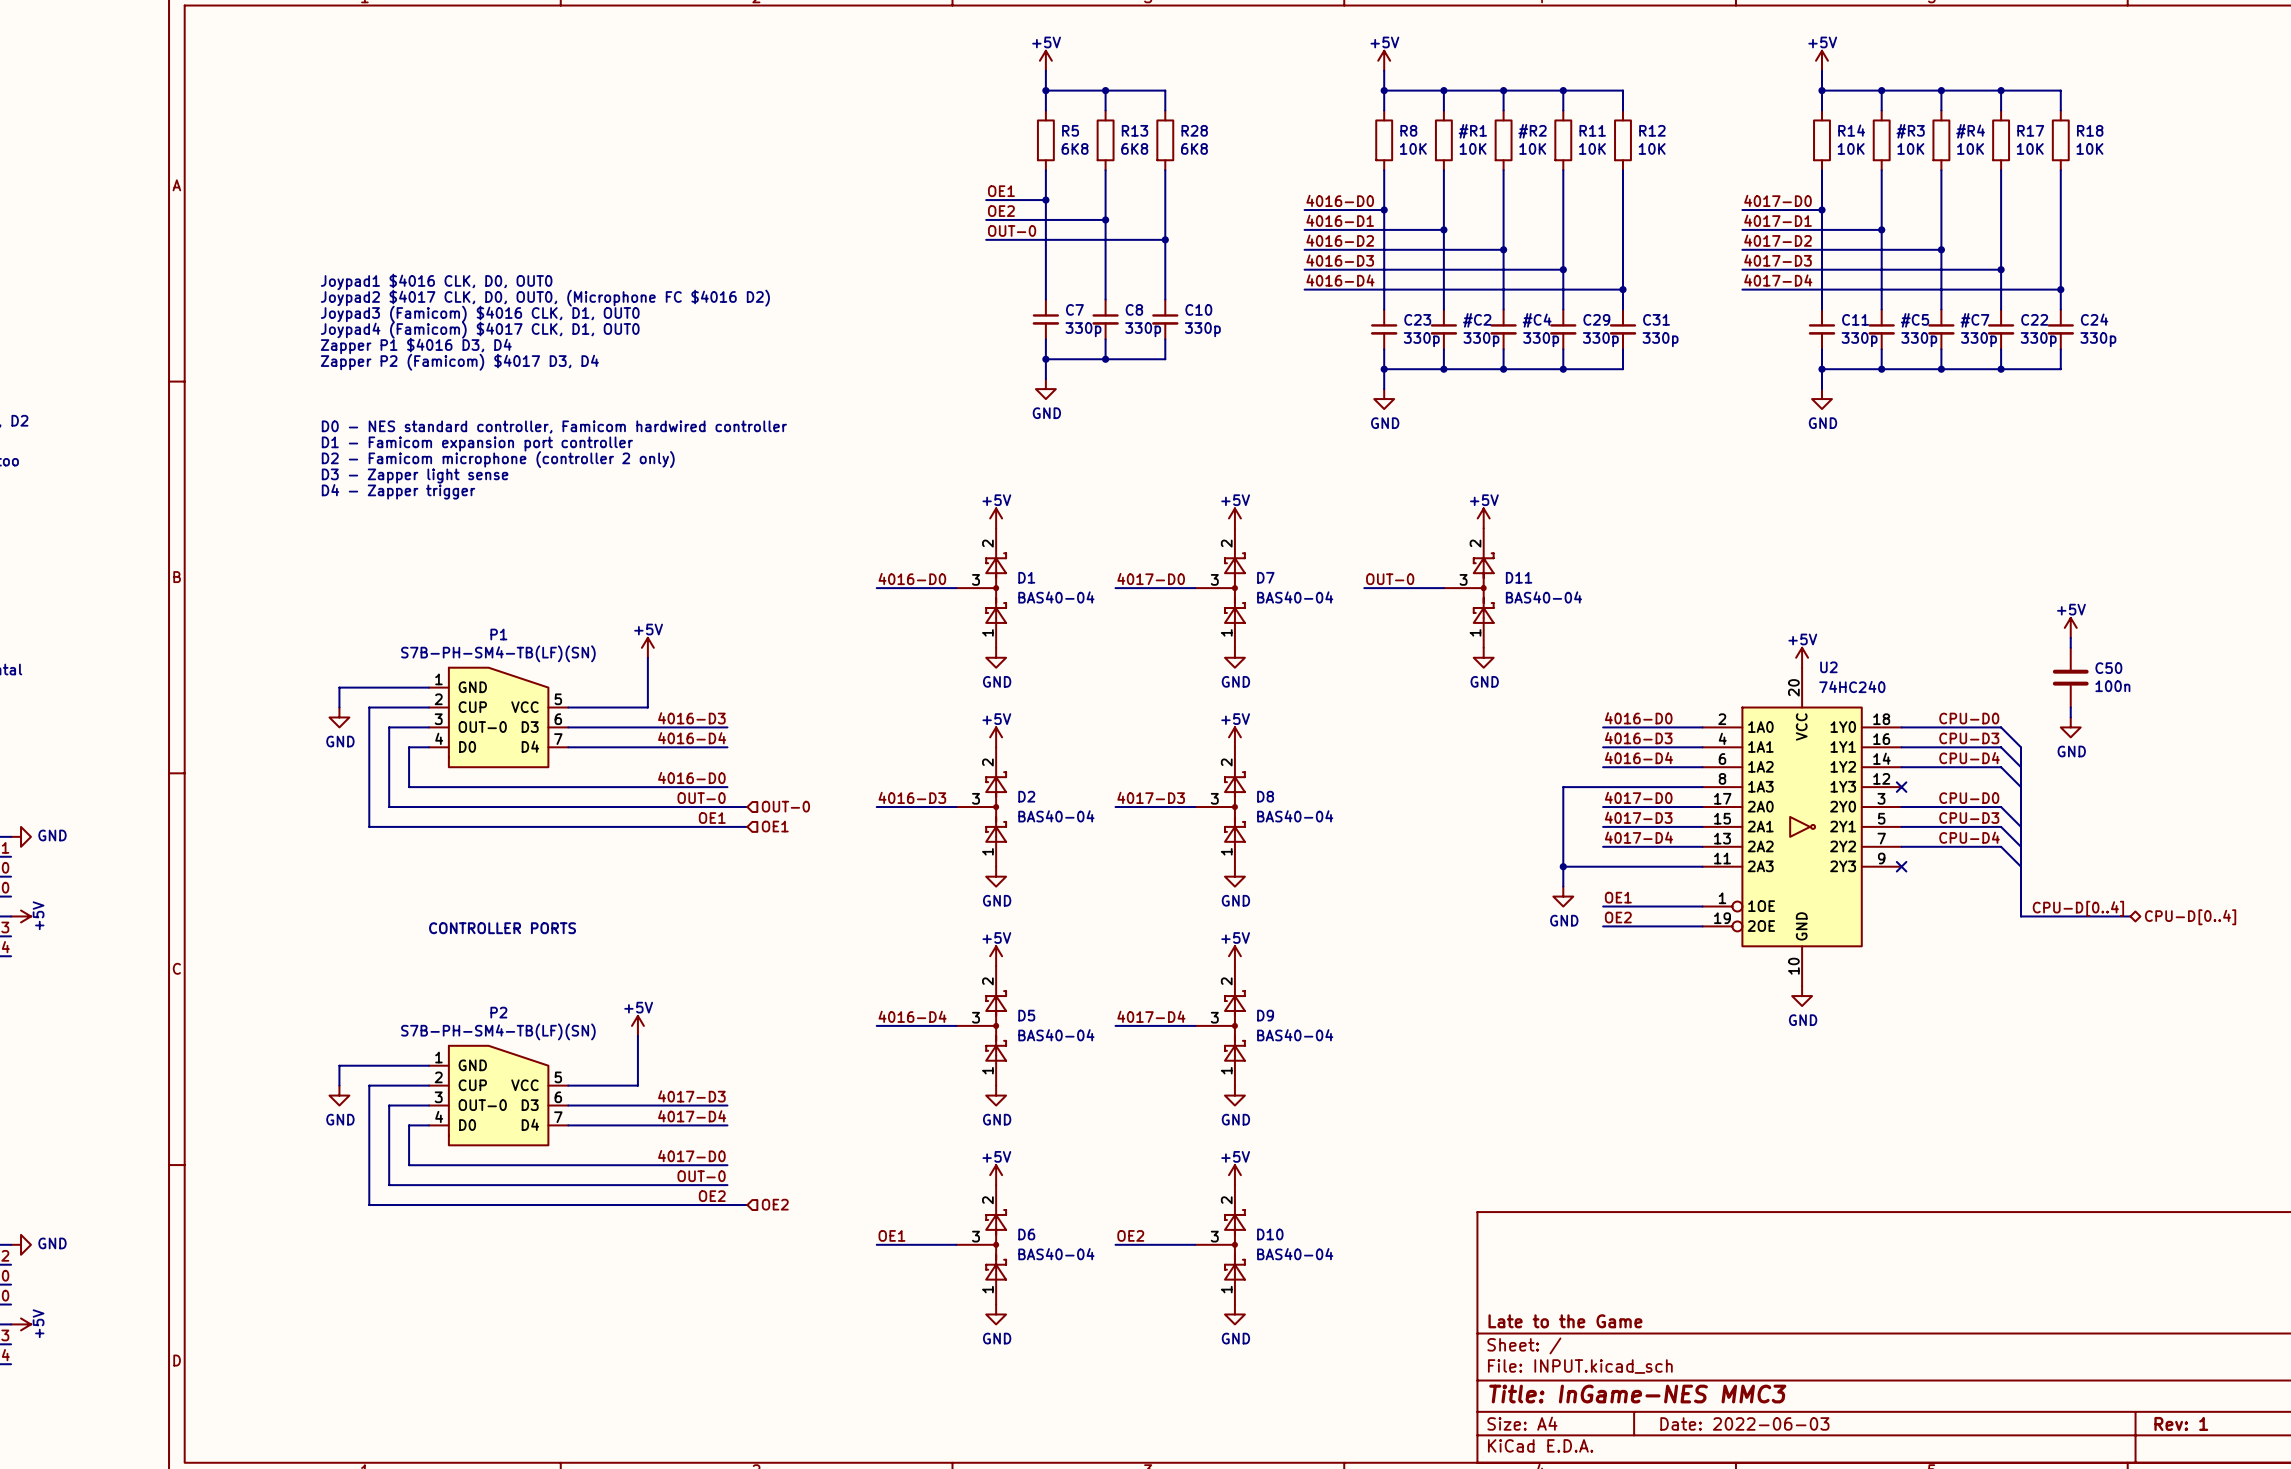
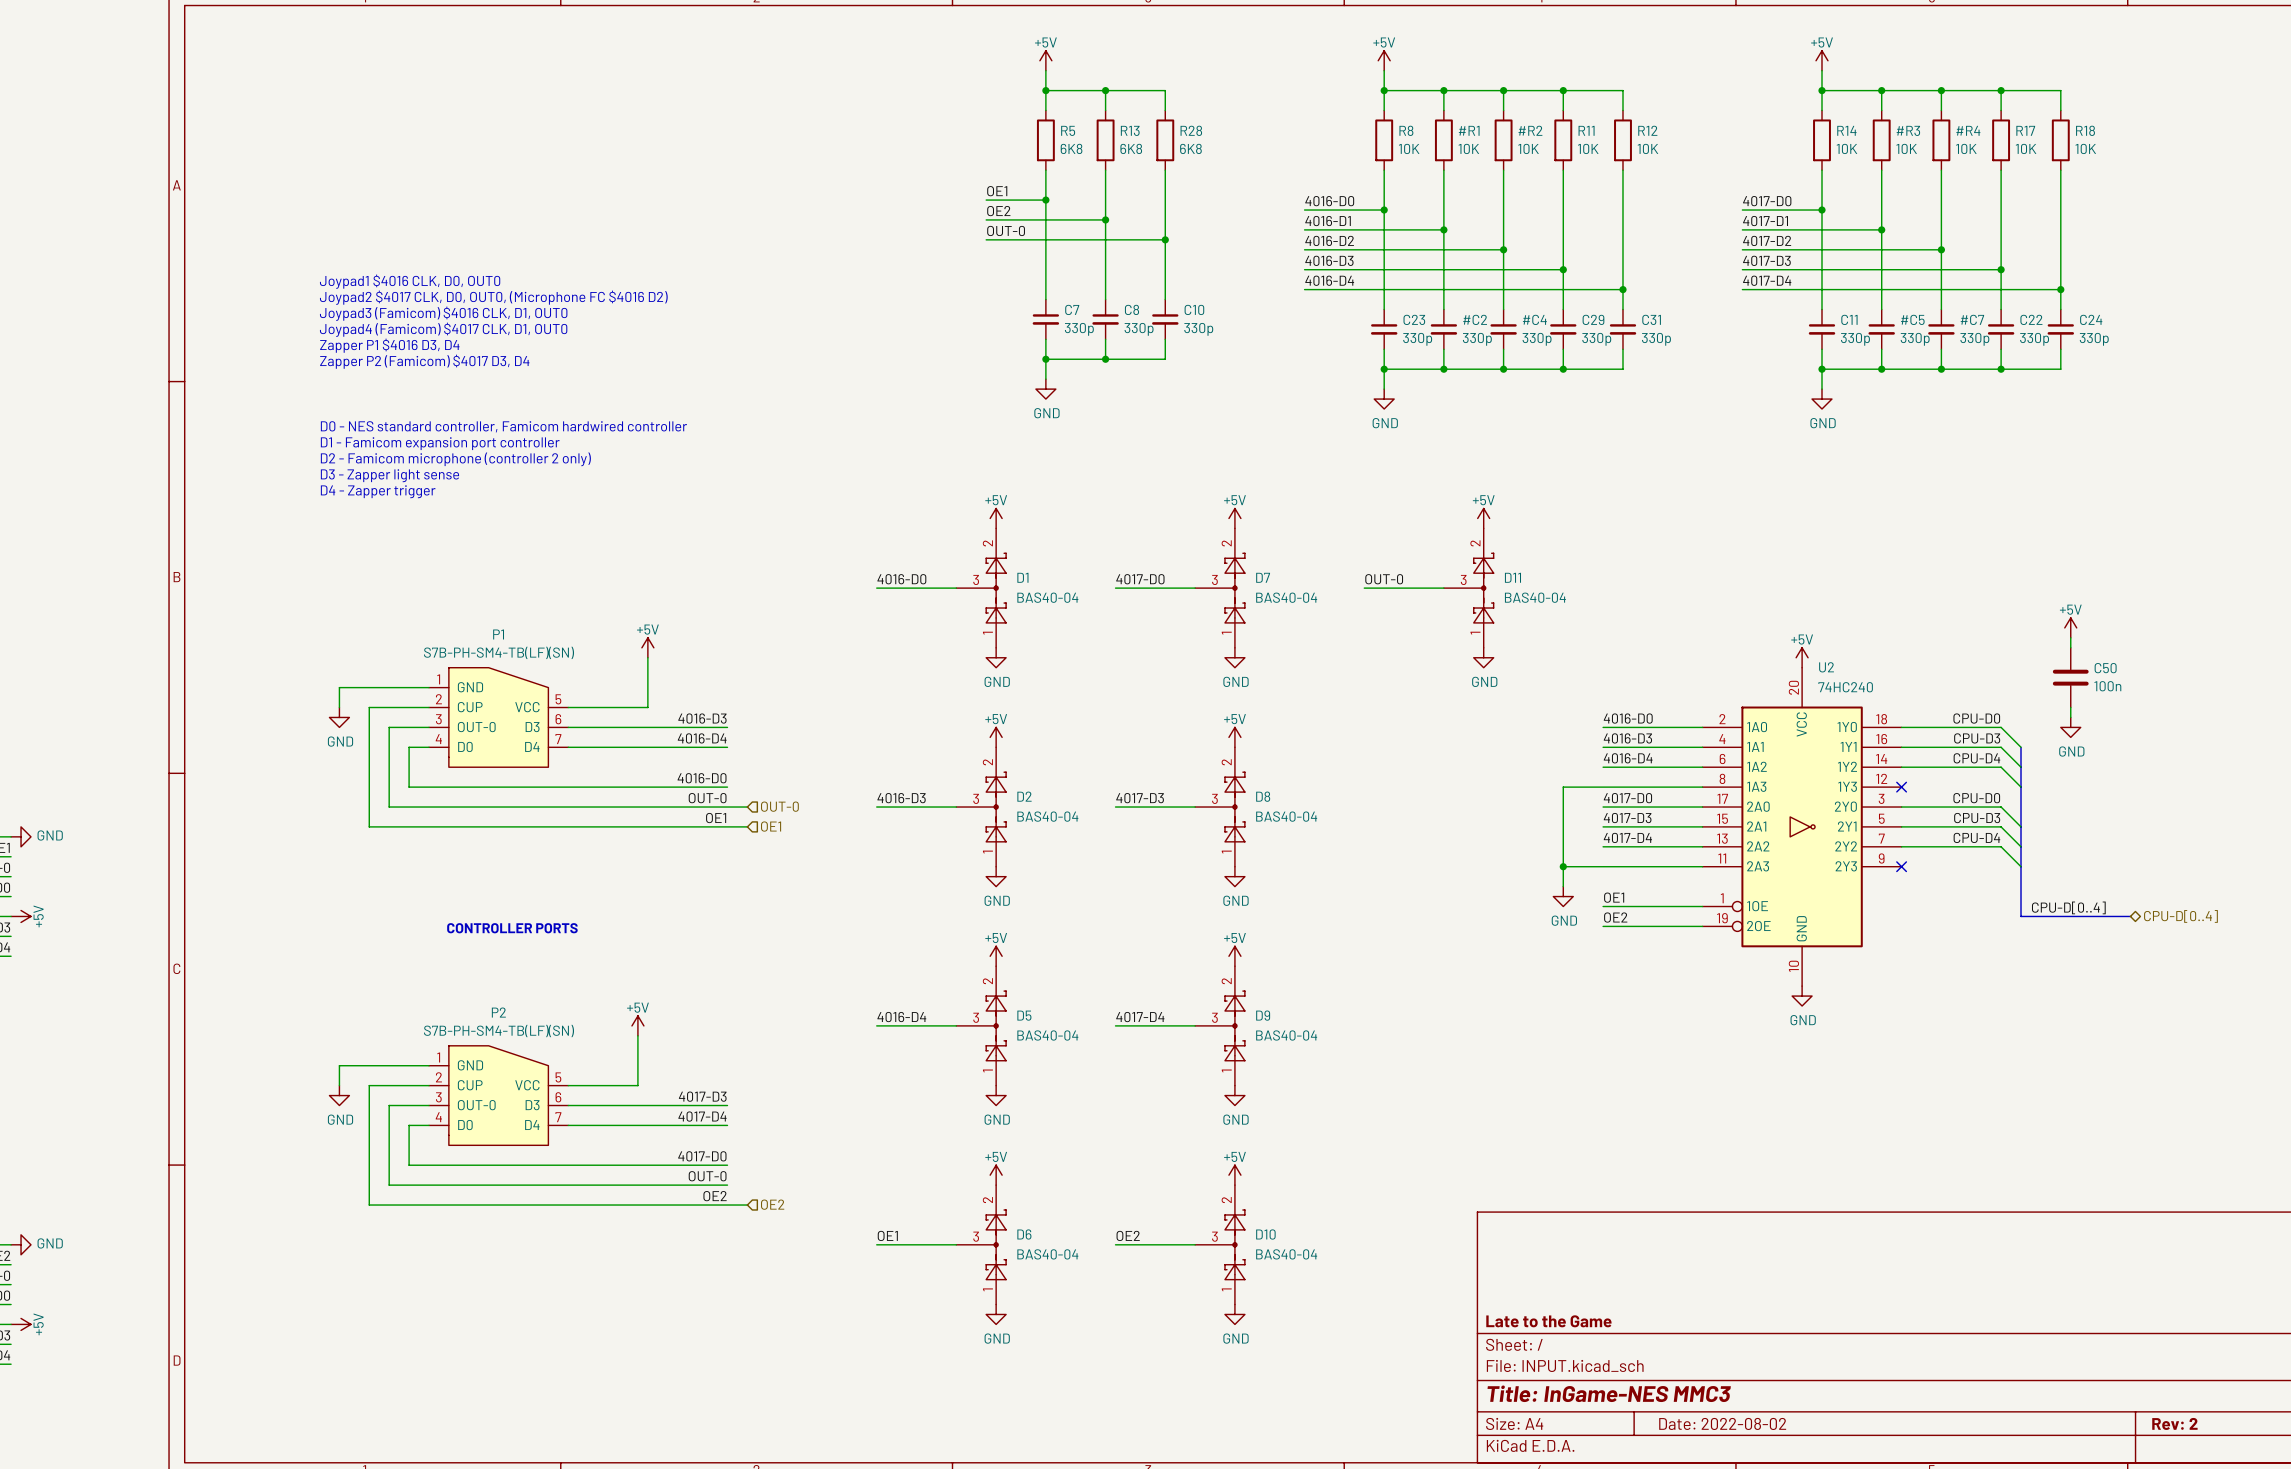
title block: Date: 2022-06-03 (1744, 1423) -> Date: 2022-08-02 (1722, 1423)
title block: Rev: 1 (2181, 1423) -> Rev: 2 (2174, 1423)

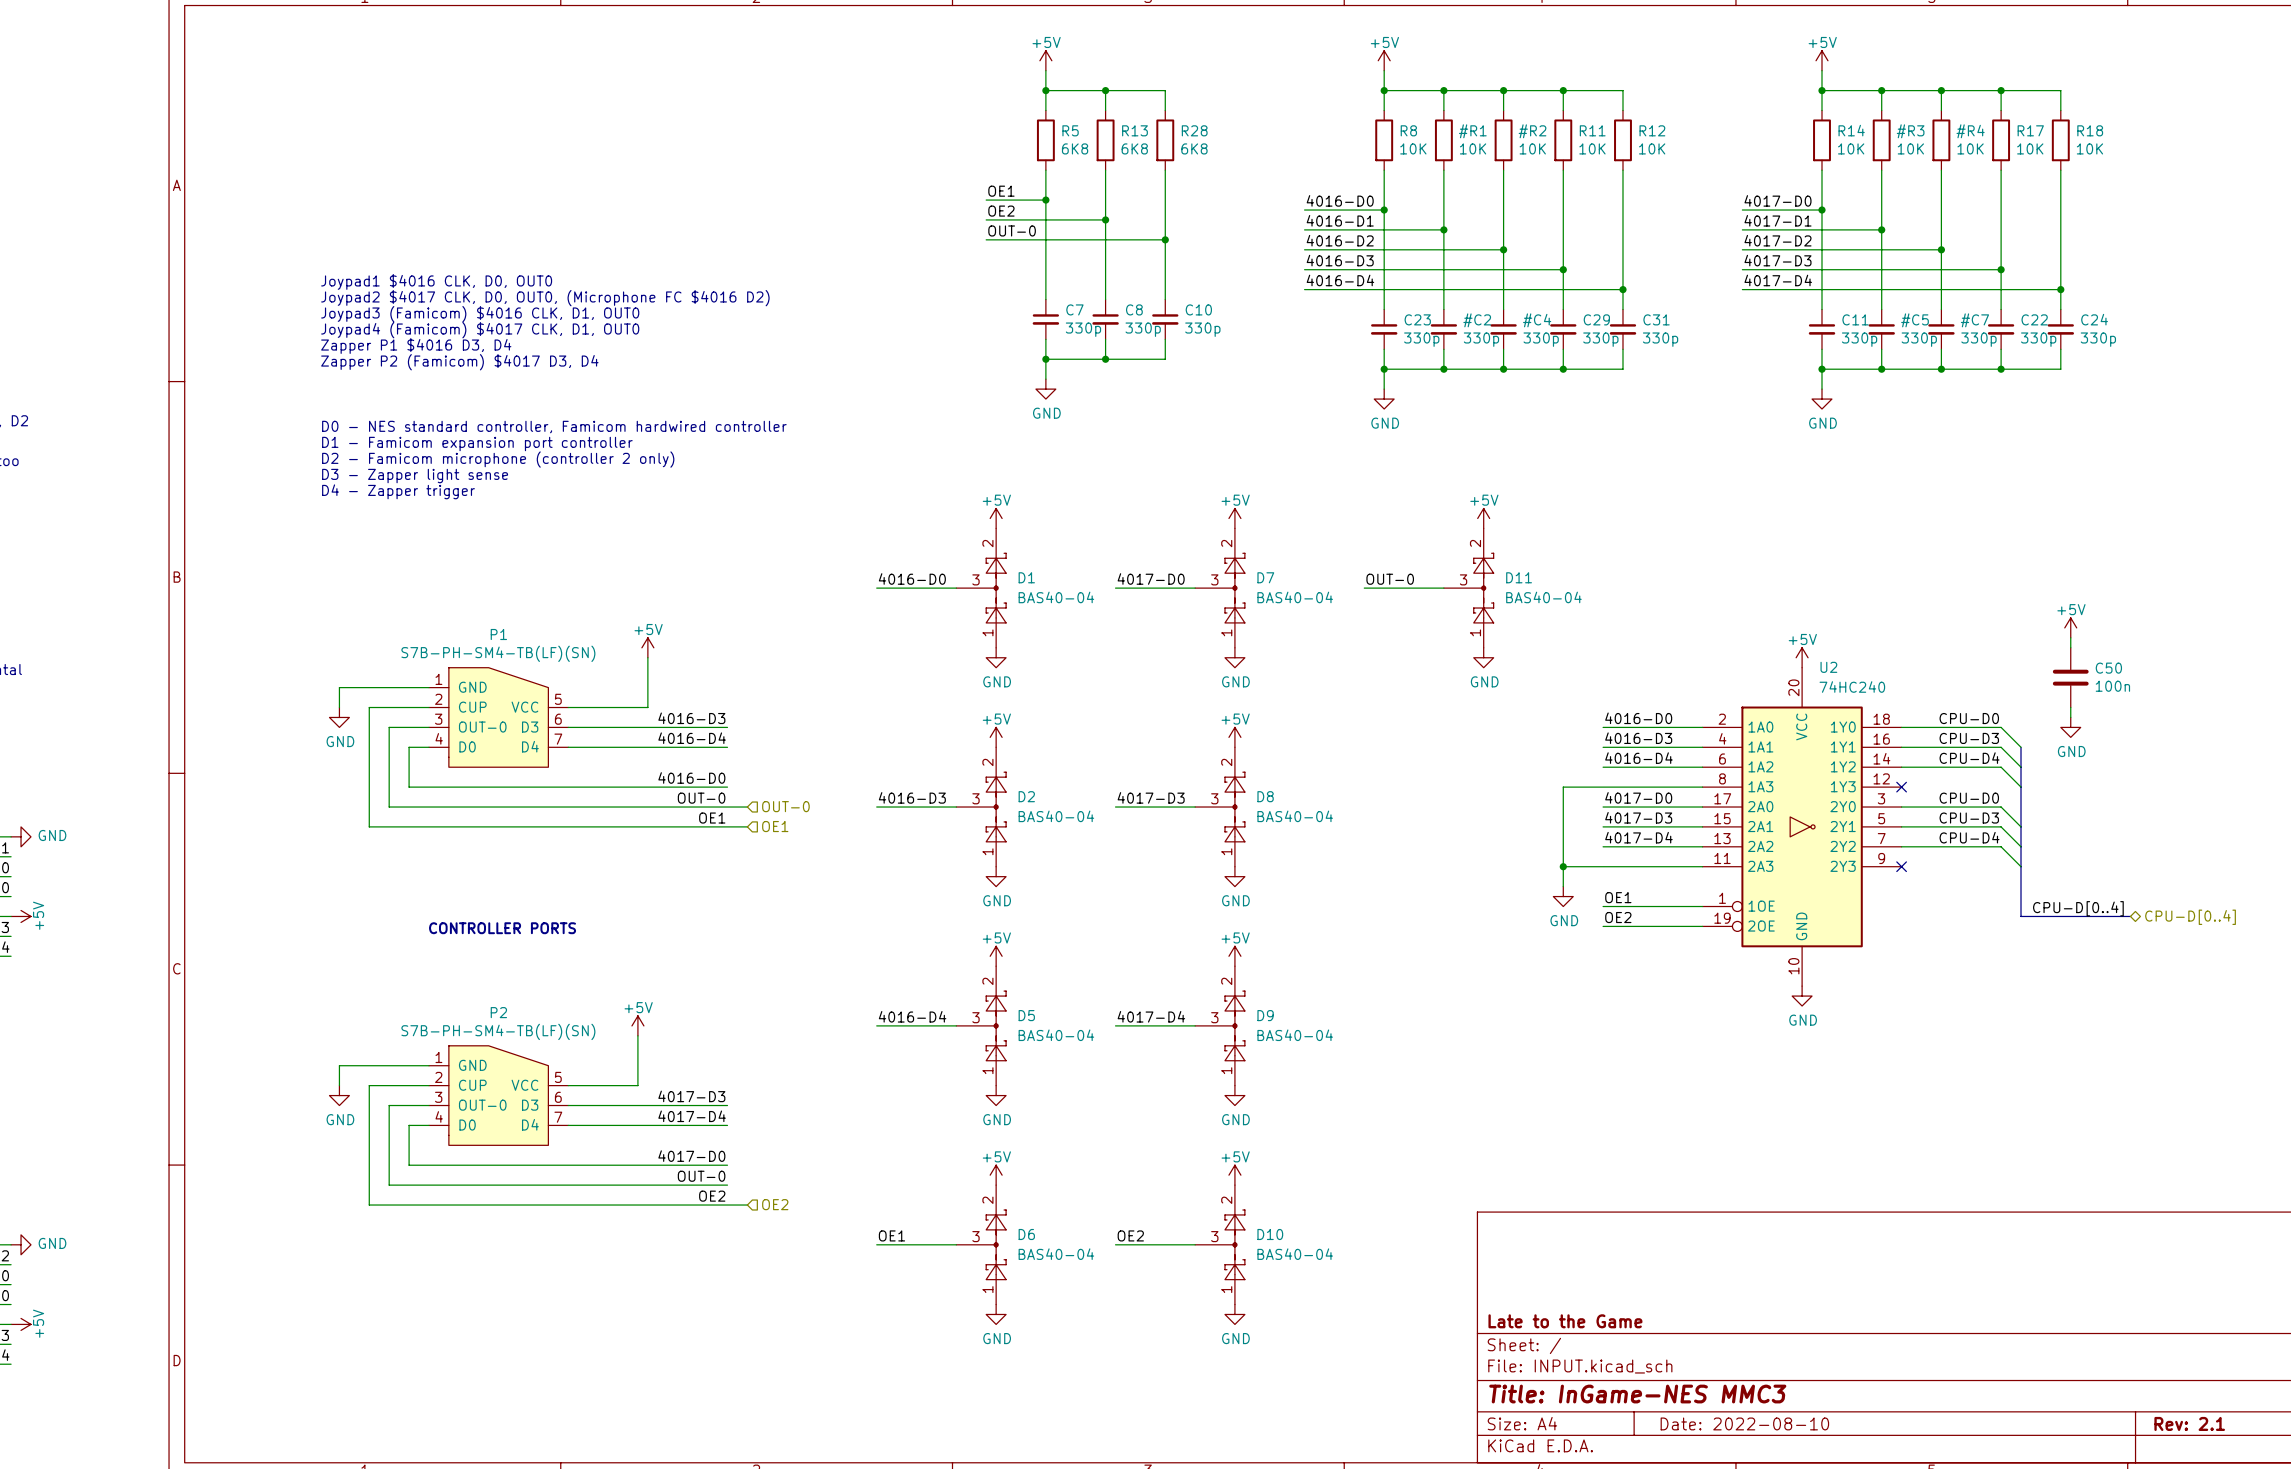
title block: Date: 2022-08-02 (1722, 1423) -> Date: 2022-08-10 (1744, 1423)
title block: Rev: 2 (2174, 1423) -> Rev: 2.1 (2189, 1423)

